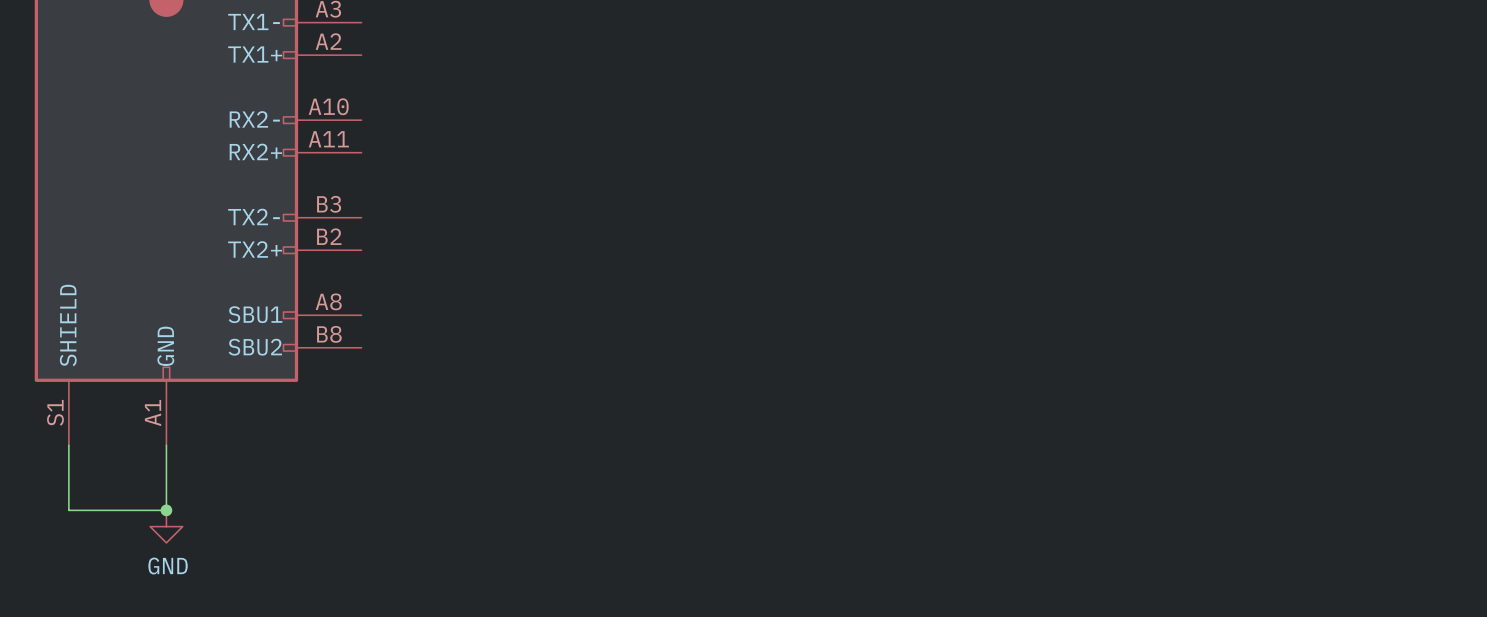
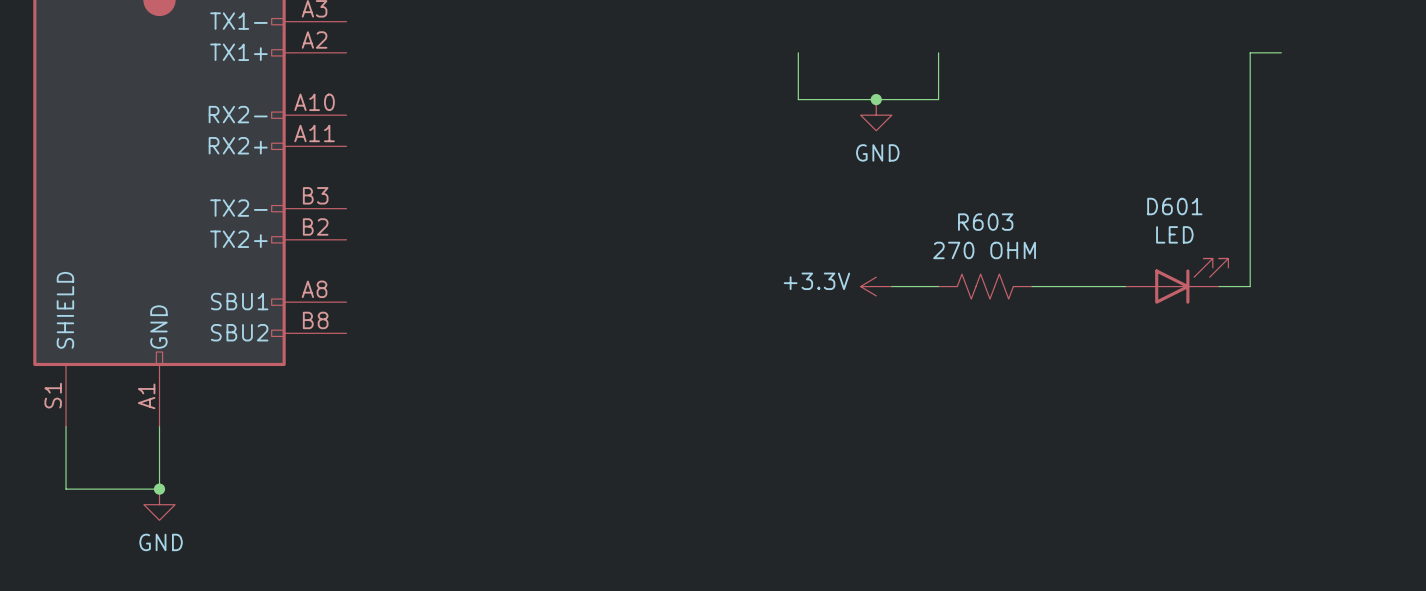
wire: none -> (798, 52) (798, 99) (938, 99) (938, 52)
wire: none -> (1281, 52) (1250, 52) (1250, 286) (1219, 286)
junction: none -> (876, 99)
power symbol: none -> GND (876, 115)
D601: none -> LED (1176, 281)
power symbol: none -> +3.3V (876, 286)
wire: none -> (891, 286) (938, 286)
R603: none -> 270 OHM (985, 286)
wire: none -> (1032, 286) (1125, 286)

